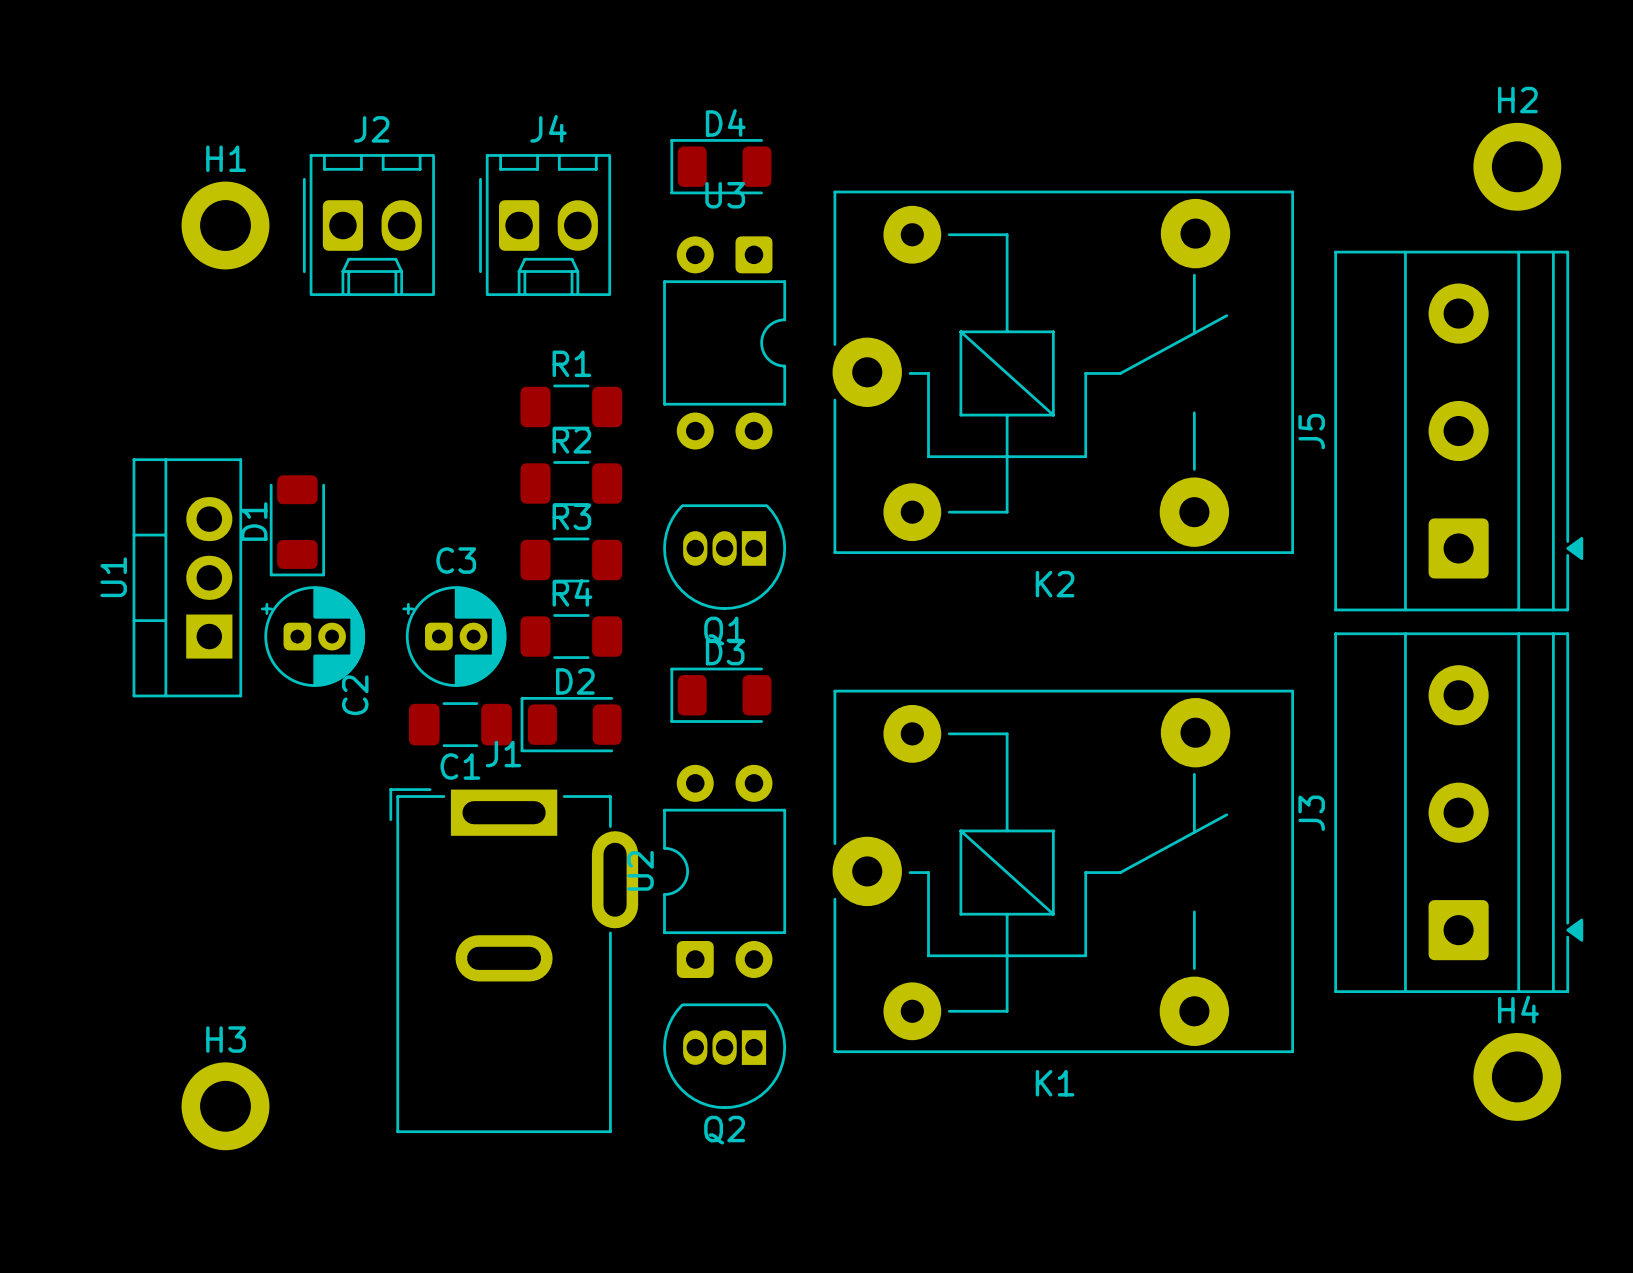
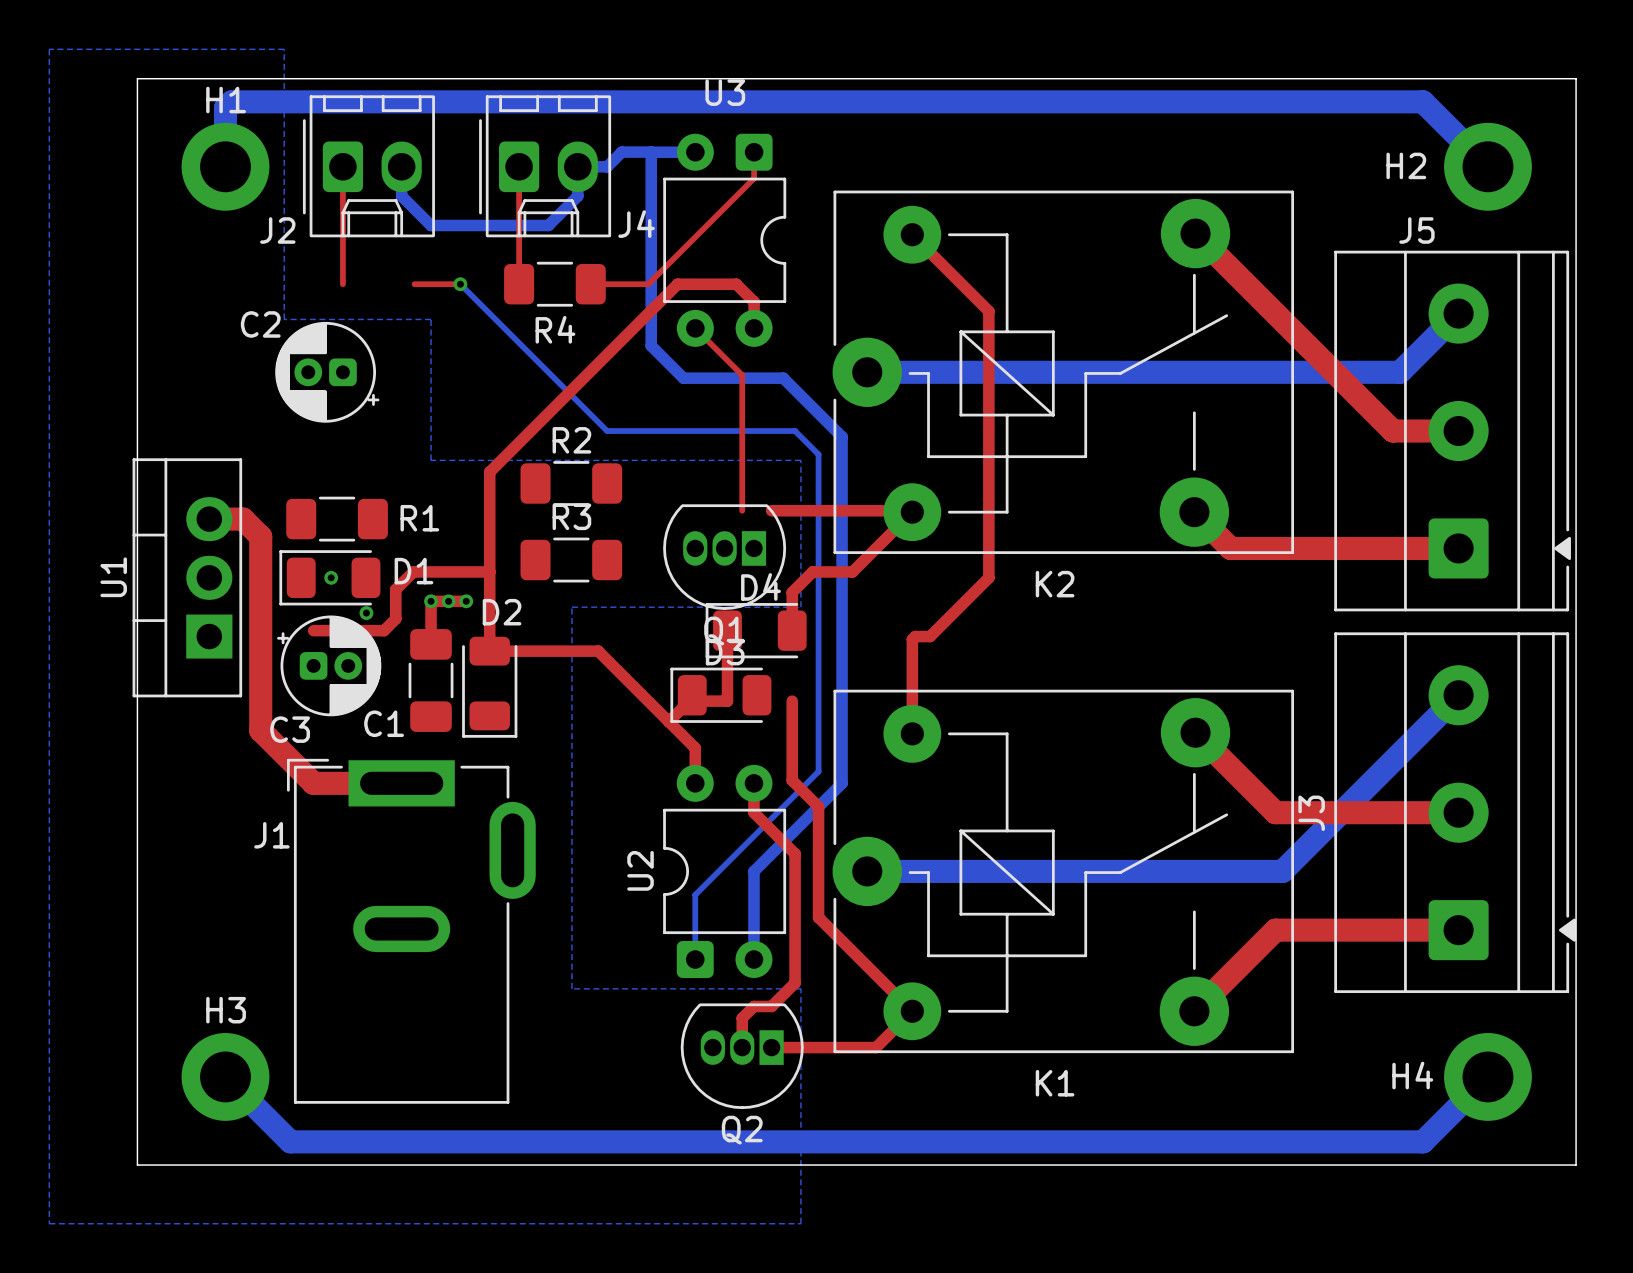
bottom zone outline: none -> (49, 49) (284, 49) (284, 319) (431, 319) (431, 460) (800, 460) (800, 607) (571, 607) (571, 988) (800, 988) (800, 1223) (49, 1223) (49, 49)
board edge: none -> (137, 78) (1576, 78) (1576, 1165) (137, 1165) (137, 78)
H2 name position: H2 (1517, 100) -> H2 (1406, 165)
J4 name position: J4 (548, 128) -> J4 (636, 224)
J2 name position: J2 (371, 129) -> J2 (277, 230)
bottom track: none -> (650, 152) (621, 152) (607, 166) (577, 166) (577, 196) (548, 225) (431, 225) (401, 196) (401, 166)
bottom track: none -> (651, 152) (695, 152)
bottom track: none -> (651, 152) (651, 345) (683, 378) (783, 378) (842, 436) (842, 783) (753, 871) (753, 959)
top track: none -> (754, 152) (754, 178) (648, 284) (590, 284)
bottom track: none -> (225, 166) (225, 108) (231, 101) (1423, 101) (1487, 166)
top track: none -> (342, 166) (342, 284)
top track: none -> (519, 166) (519, 284)
D4 position: (720, 166) -> (756, 630)
H2 position: (1517, 166) -> (1487, 166)
H1 position: (225, 225) -> (225, 166)
J2 position: (368, 225) -> (368, 166)
J4 position: (545, 225) -> (545, 166)
top track: none -> (1195, 233) (1392, 431) (1458, 431)
top track: none -> (912, 234) (988, 311) (988, 577) (930, 636) (915, 636) (912, 639) (912, 733)
J5 footprint: [1334, 250, 1584, 612] -> [1334, 250, 1571, 612]
top track: none -> (414, 284) (460, 284)
bottom track: none -> (460, 284) (607, 431) (795, 431) (818, 454) (818, 771) (695, 894) (695, 959)
via: none -> (460, 284)
bottom track: none -> (1458, 313) (1399, 372) (867, 372)
top track: none -> (695, 328) (742, 375) (742, 510)
top track: none -> (754, 328) (754, 301) (736, 284) (677, 284) (489, 472) (489, 651) (598, 651) (695, 748) (695, 783)
U3 position: (724, 342) -> (724, 240)
R1 name position: R1 (571, 363) -> R1 (419, 518)
R1 position: (571, 406) -> (337, 519)
J5 name rotation: 0° (1311, 431) -> 90° clockwise (1416, 230)
J5 name position: J5 (1311, 431) -> J5 (1416, 230)
top track: none -> (771, 510) (912, 512) (852, 571) (812, 571) (792, 592) (792, 630)
top track: none -> (1194, 513) (1230, 548) (1458, 548)
top track: none -> (209, 519) (243, 519) (260, 536) (260, 730) (313, 783) (401, 783)
D1 name position: D1 (254, 521) -> D1 (413, 571)
D1 rotation: 0° (297, 525) -> 90° clockwise (329, 577)
D1 position: (297, 525) -> (329, 577)
C3 name position: C3 (456, 560) -> C3 (290, 729)
top track: none -> (489, 571) (413, 571) (395, 589) (395, 618) (384, 630) (313, 630)
via: none -> (331, 577)
R4 name position: R4 (572, 592) -> R4 (555, 329)
via: none -> (431, 601)
via: none -> (448, 601)
top track: none -> (466, 601) (431, 601) (431, 629)
via: none -> (466, 601)
via: none -> (366, 613)
top track: none -> (727, 630) (727, 701) (689, 701) (668, 721)
J3 footprint: [1334, 632, 1584, 994] -> [1334, 632, 1576, 994]
C2 rotation: 0° (313, 636) -> 180° (327, 372)
C2 position: (313, 636) -> (327, 372)
C3 position: (454, 636) -> (329, 665)
R4 position: (571, 636) -> (554, 284)
bottom track: none -> (1458, 695) (1282, 871) (867, 871)
top track: none -> (792, 701) (792, 780) (818, 806) (818, 917) (912, 1011) (876, 1047) (771, 1047)
C1 rotation: 0° (460, 724) -> 90° clockwise (431, 680)
D2 rotation: 0° (571, 724) -> 90° counterclockwise (489, 687)
D2 position: (571, 724) -> (489, 687)
top track: none -> (1195, 732) (1275, 812) (1458, 812)
J1 name position: J1 (503, 754) -> J1 (271, 835)
top track: none -> (753, 783) (753, 812) (795, 853) (795, 982) (771, 1006) (753, 1006) (742, 1018) (742, 1047)
top track: none -> (1458, 930) (1275, 930) (1194, 1011)
J1 position: (513, 960) -> (411, 931)
H4 name position: H4 (1518, 1009) -> H4 (1412, 1075)
Q2 position: (724, 1056) -> (742, 1056)
bottom track: none -> (225, 1076) (290, 1141) (1423, 1141) (1487, 1076)
H4 position: (1517, 1076) -> (1487, 1076)
H3 position: (225, 1106) -> (225, 1076)

